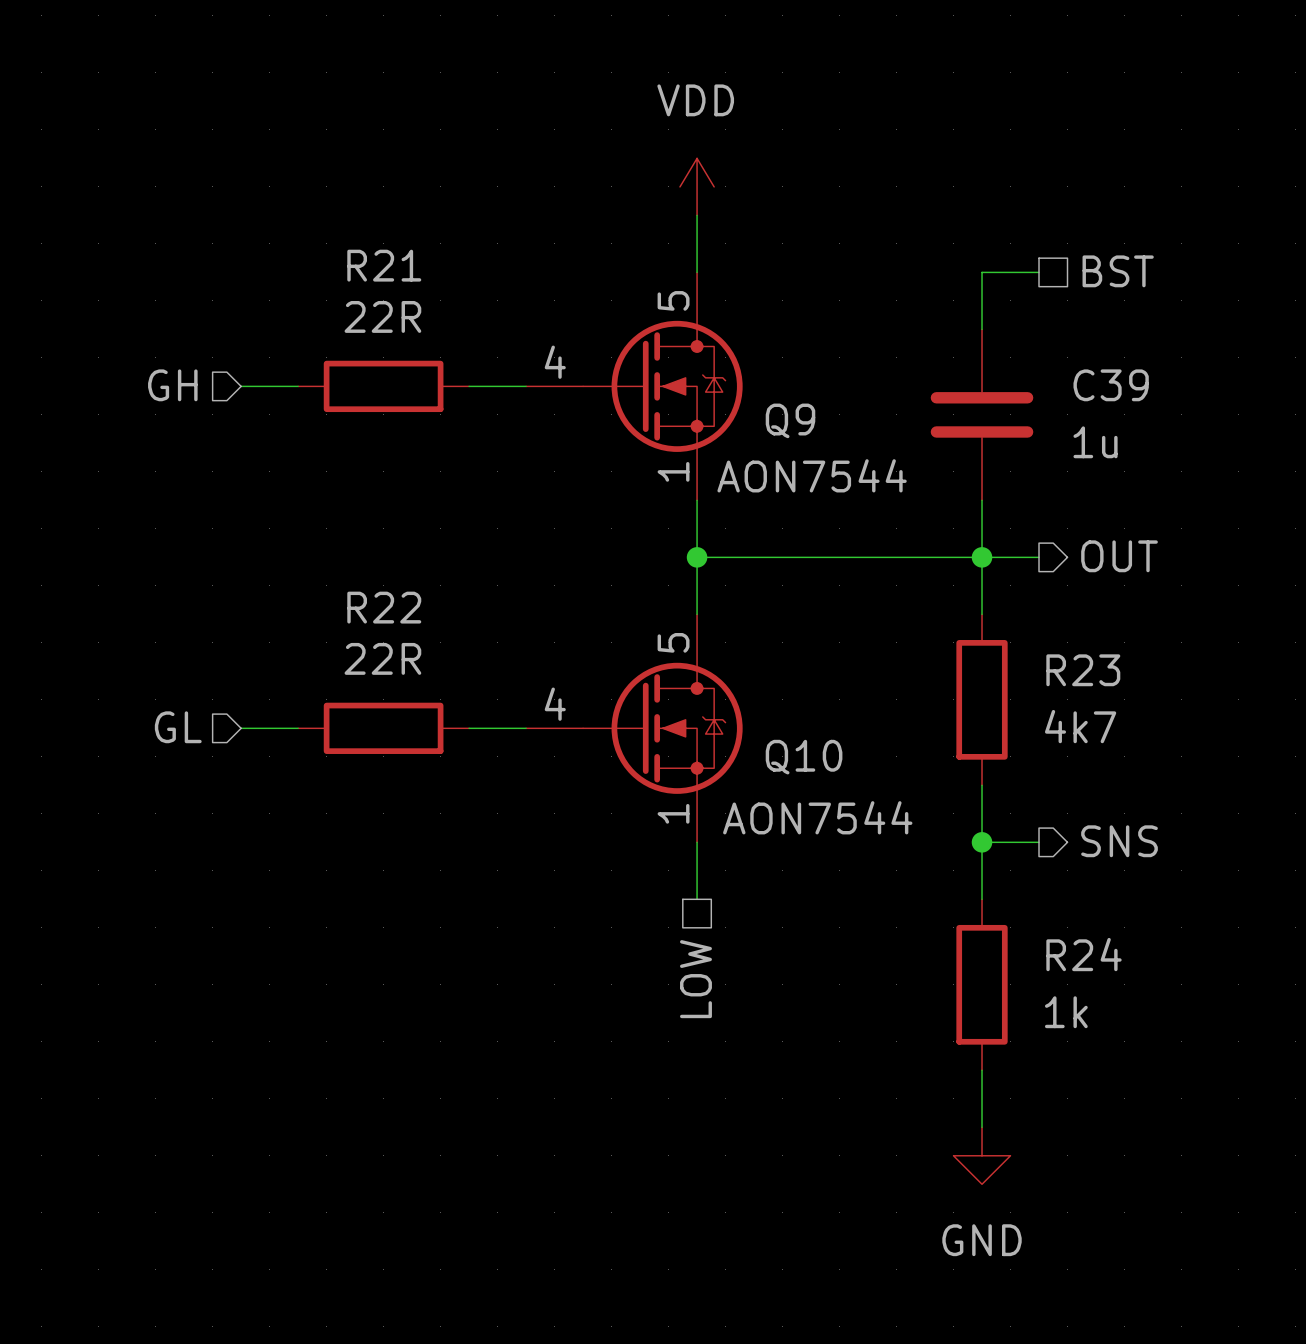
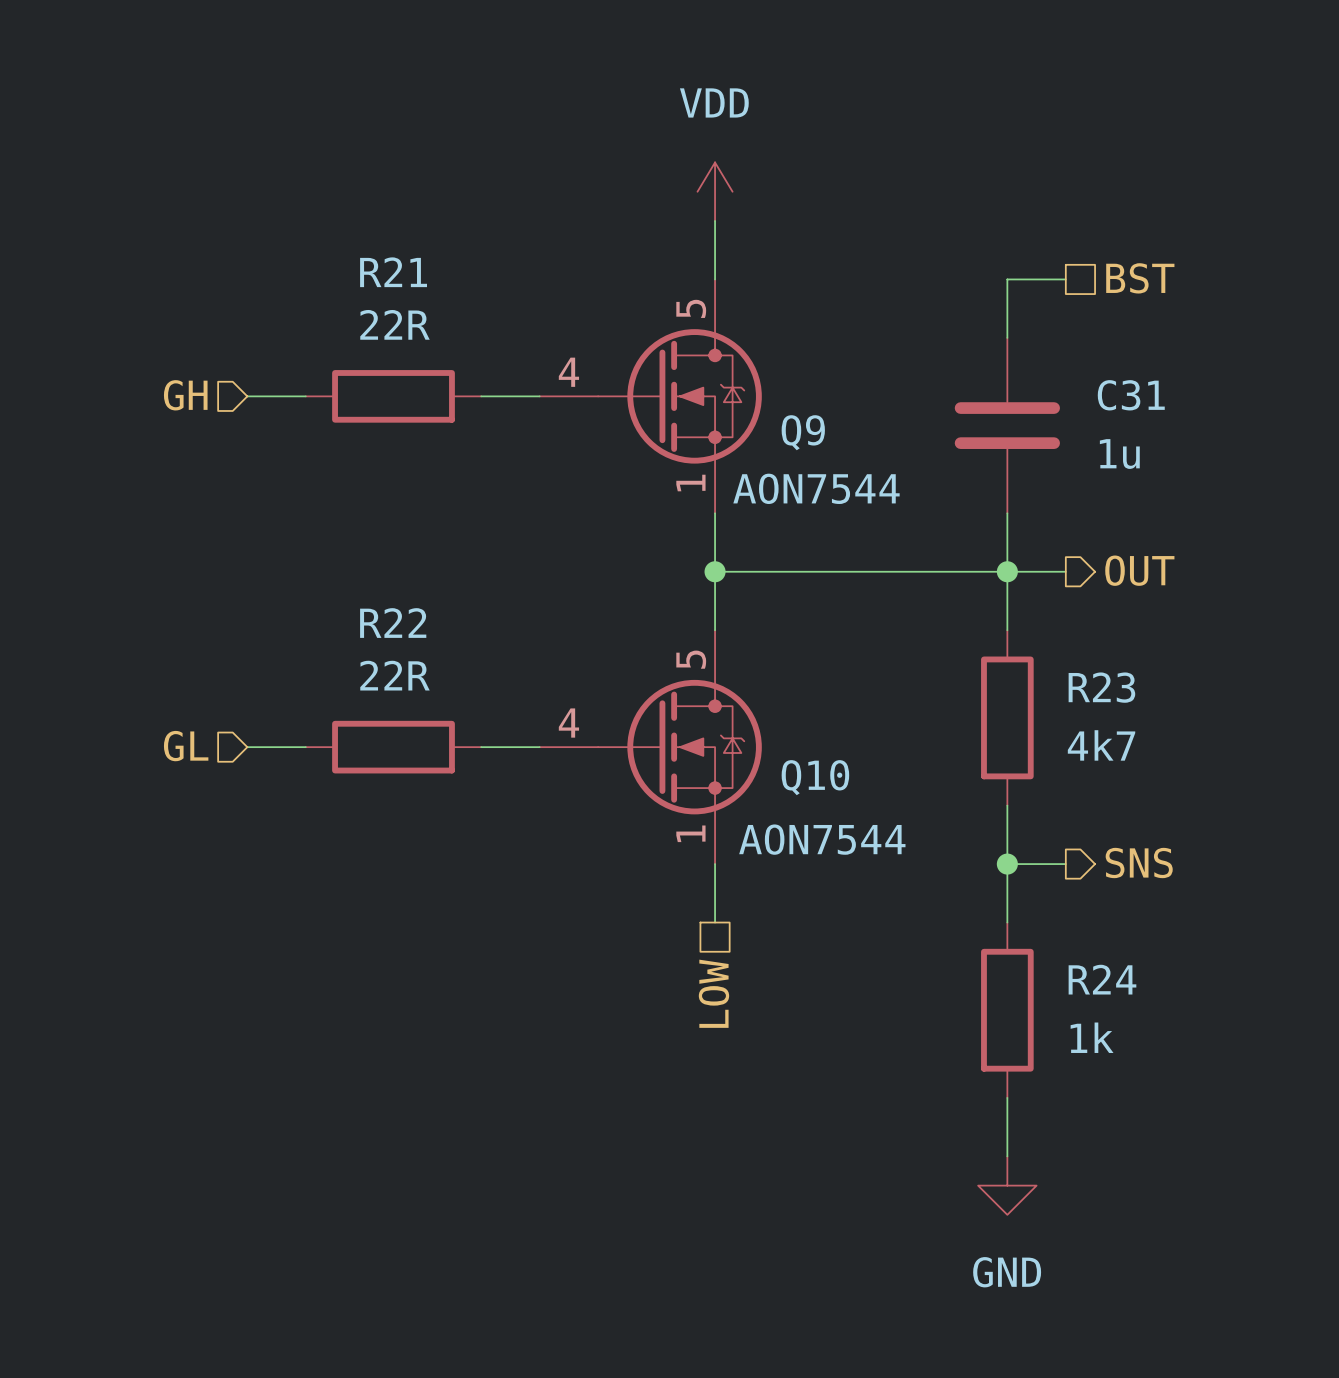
C39 name: C39 (1111, 385) -> C31 (1131, 395)

